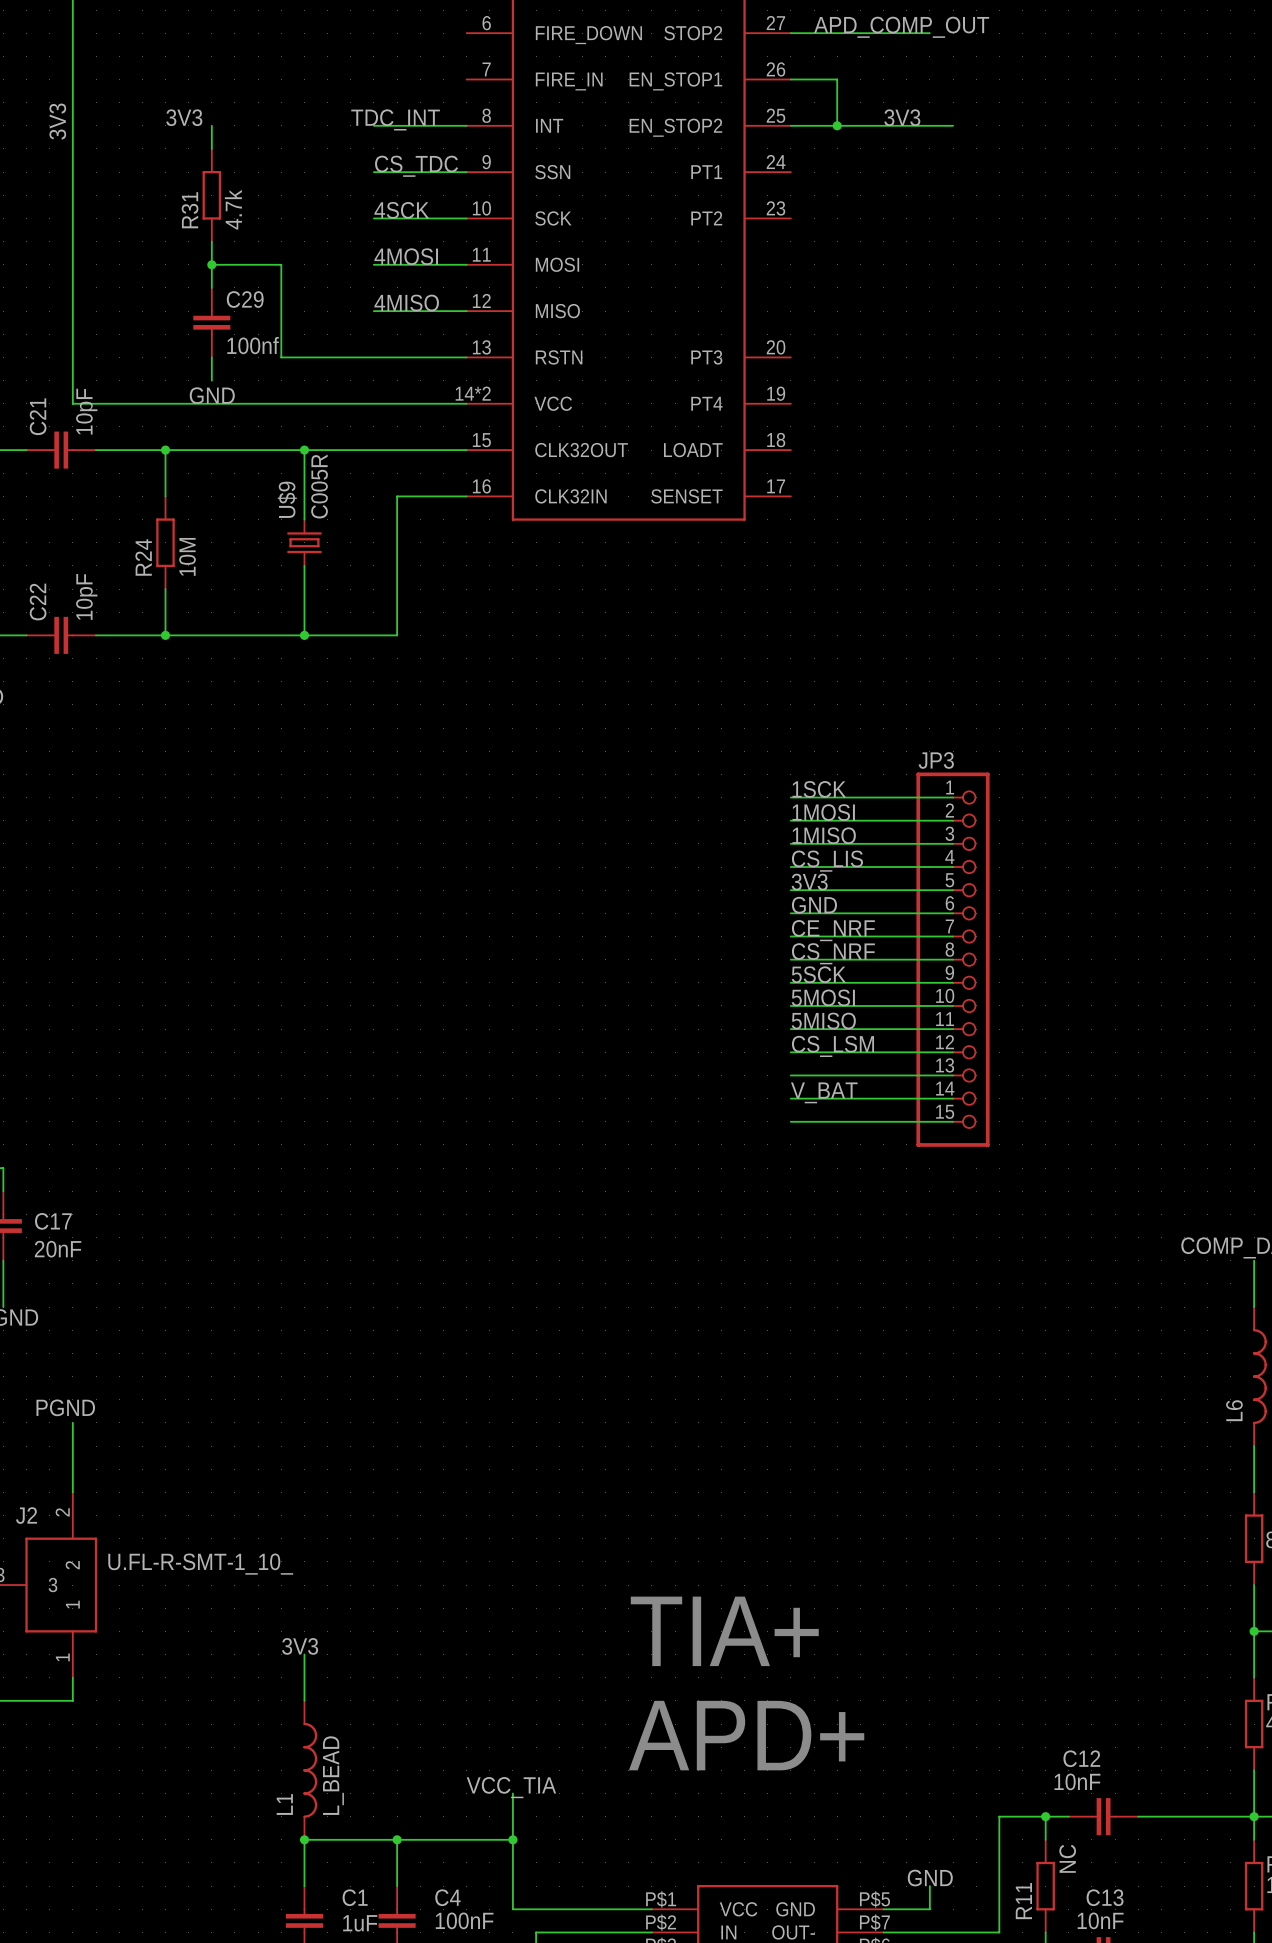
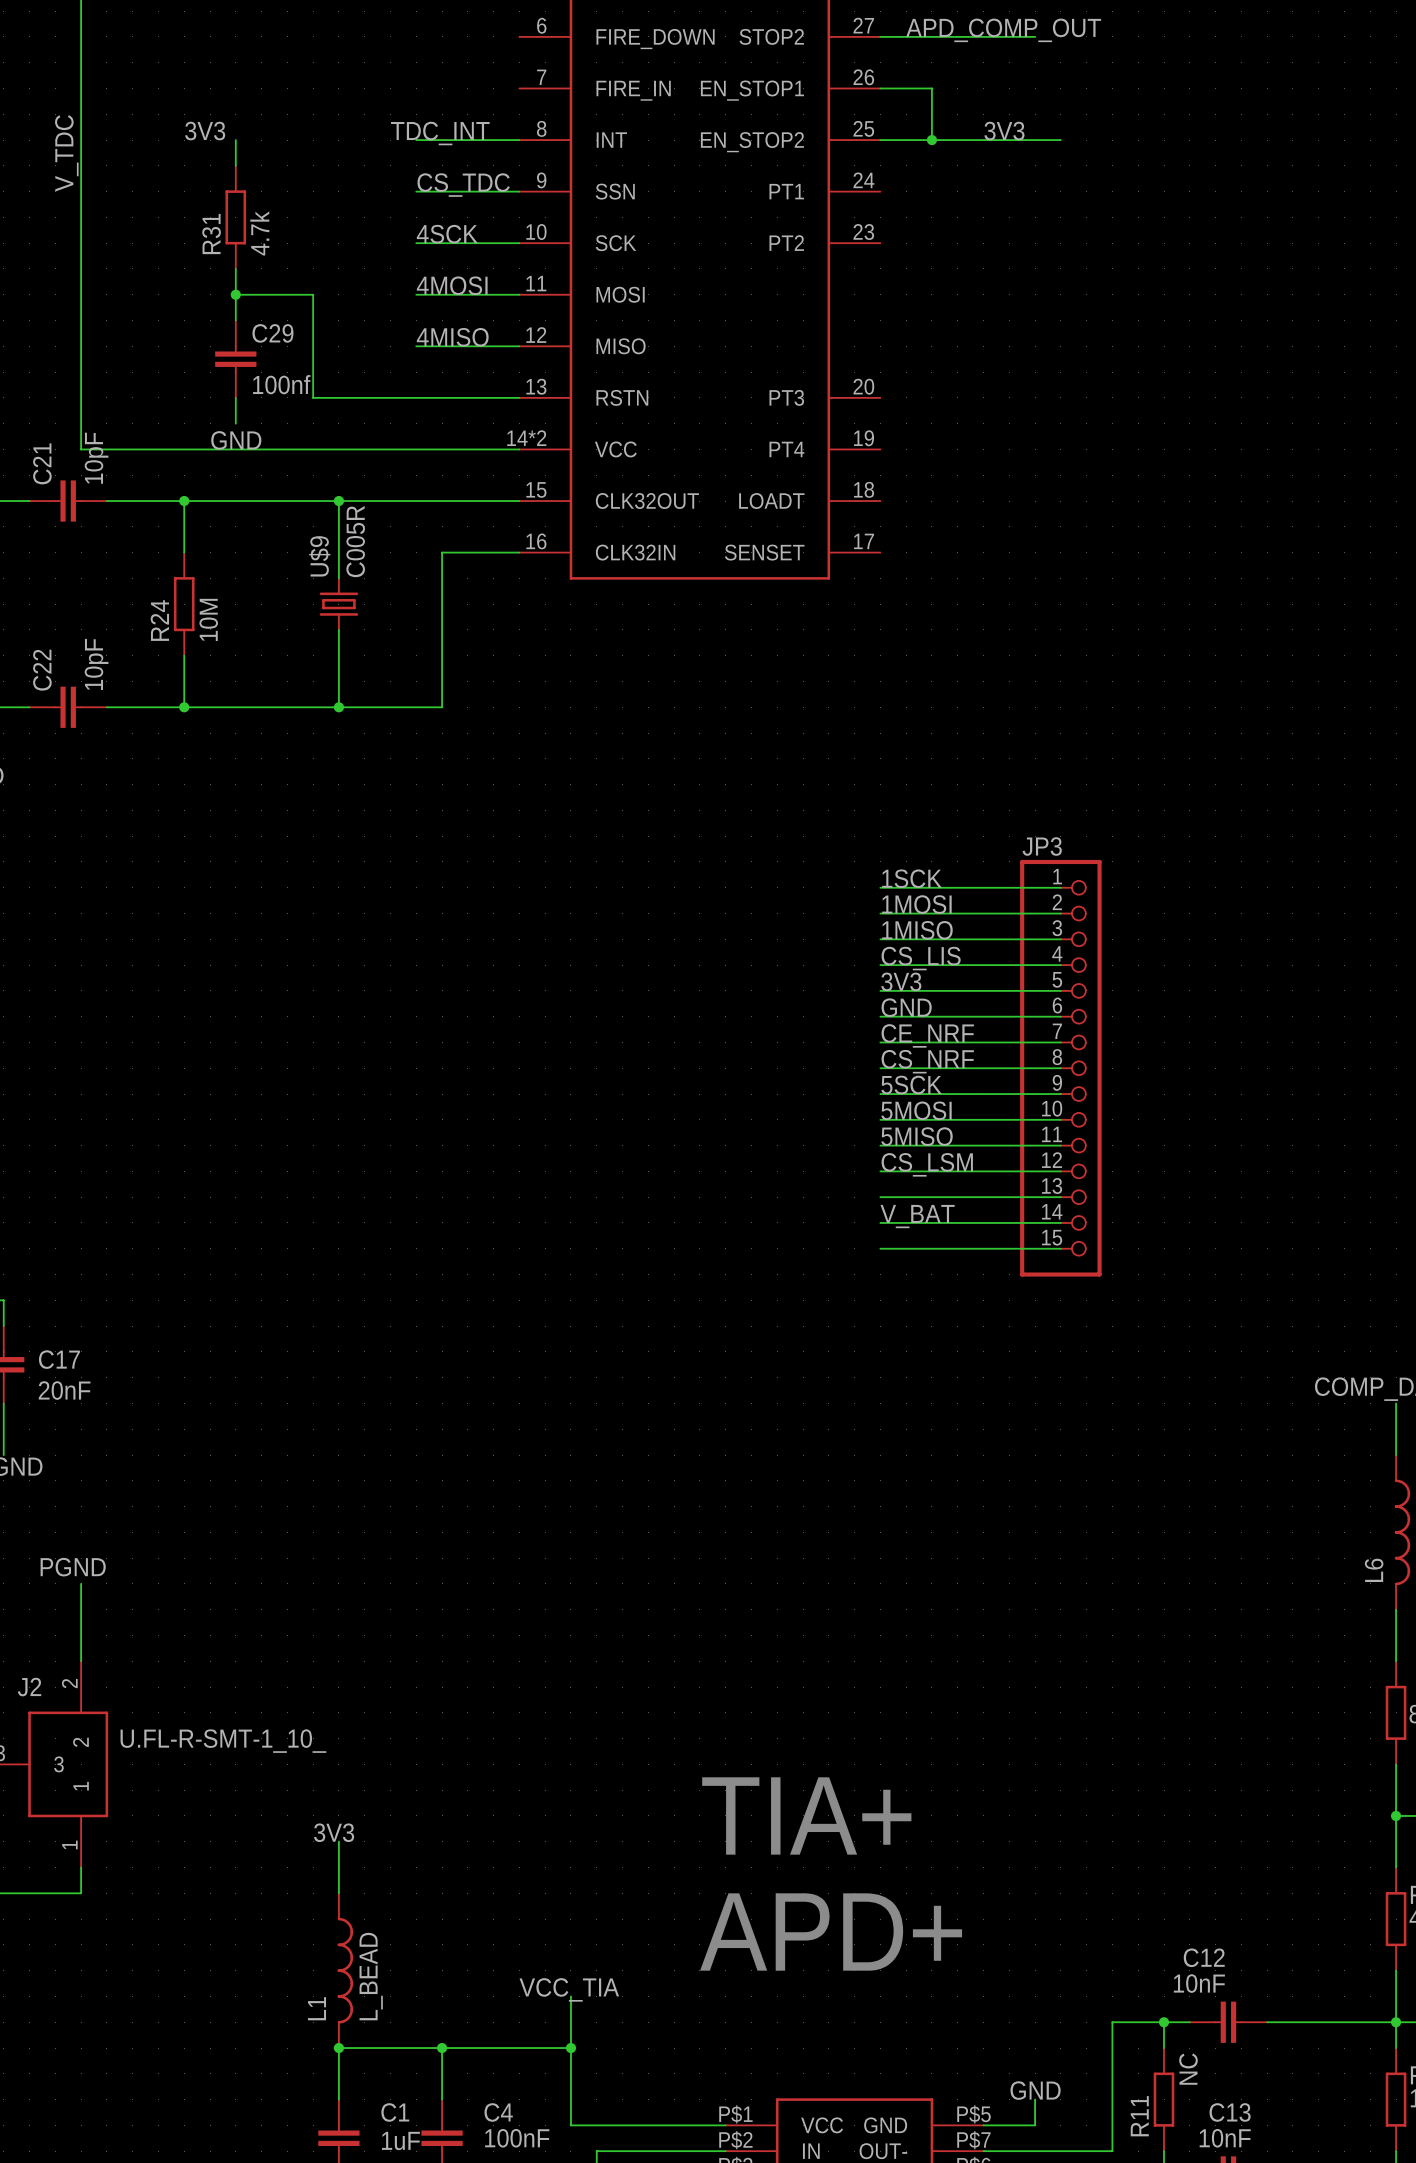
label: 3V3 (57, 121) -> V_TDC (66, 153)

